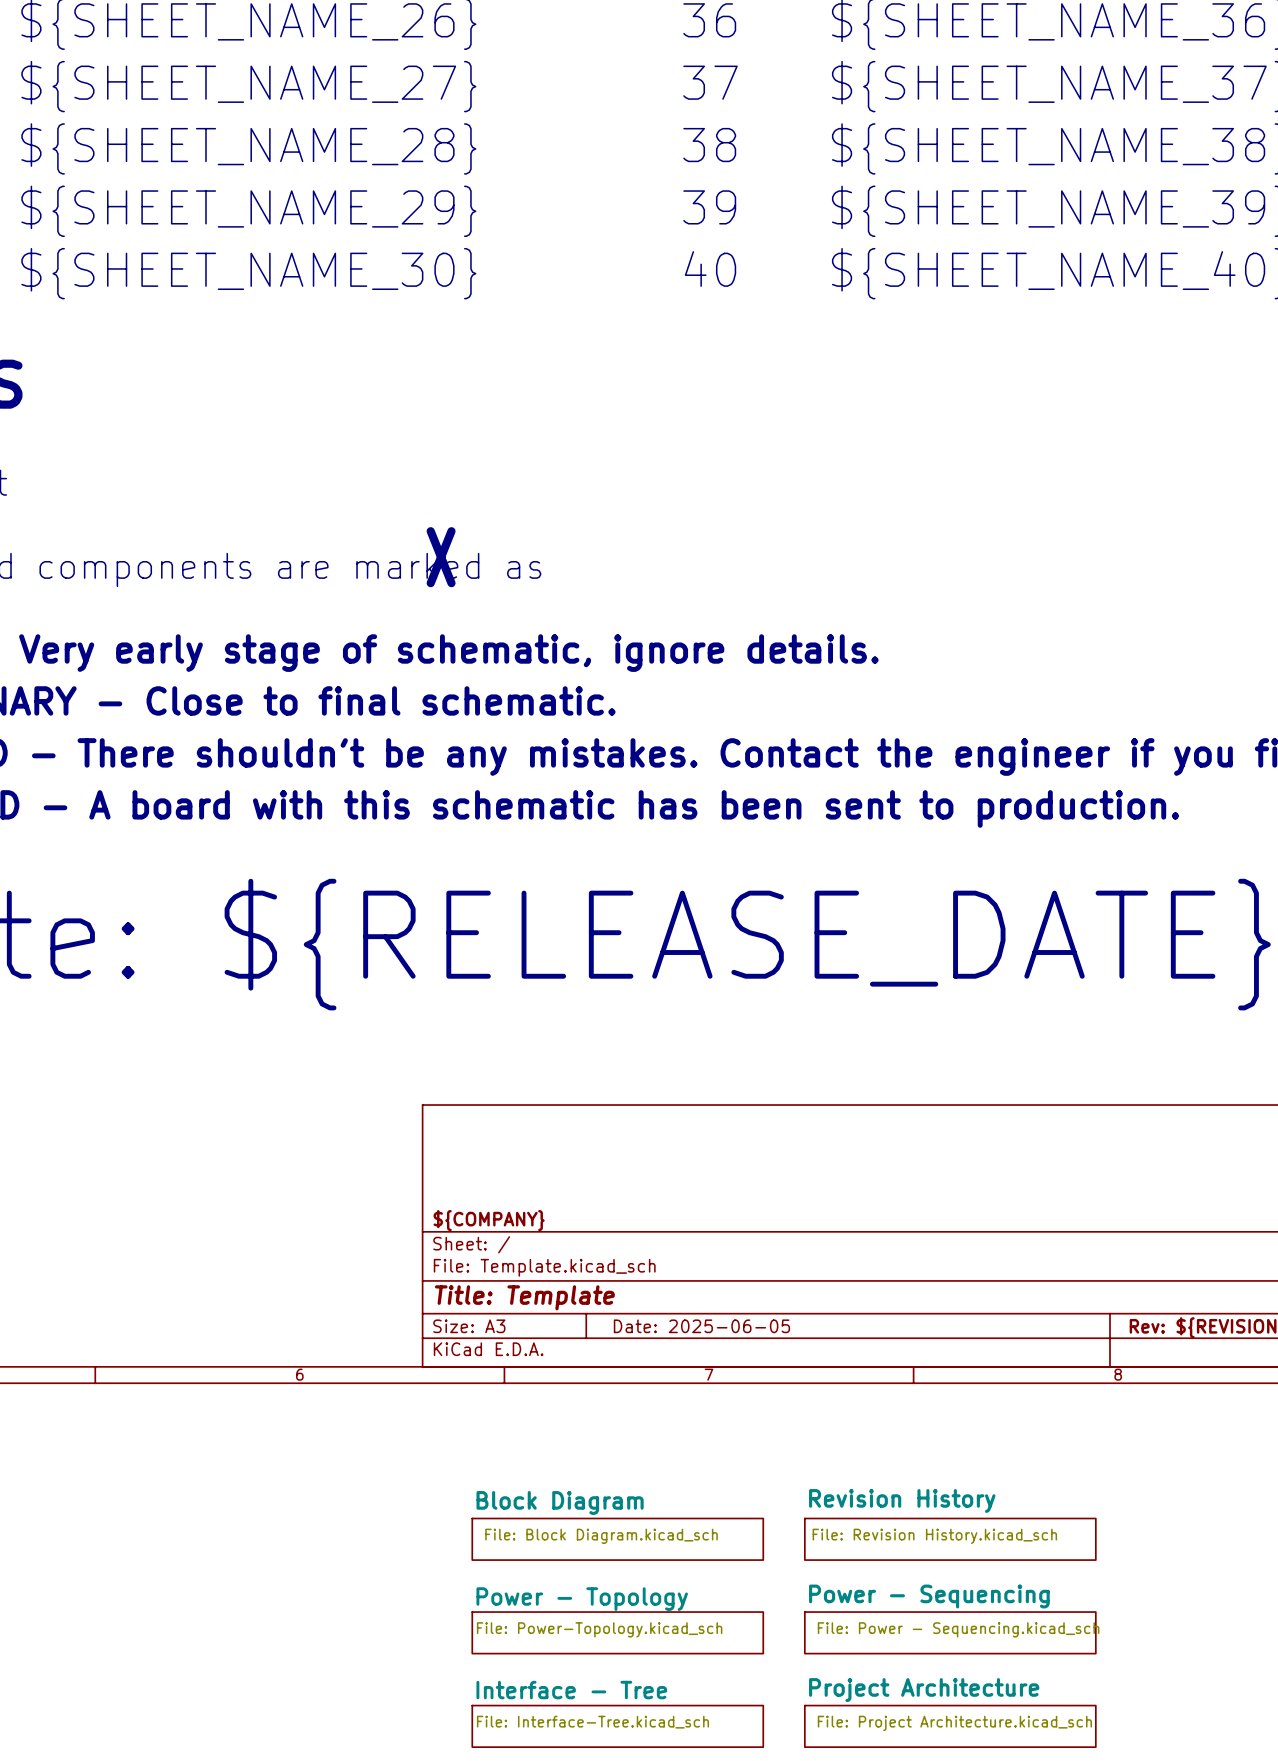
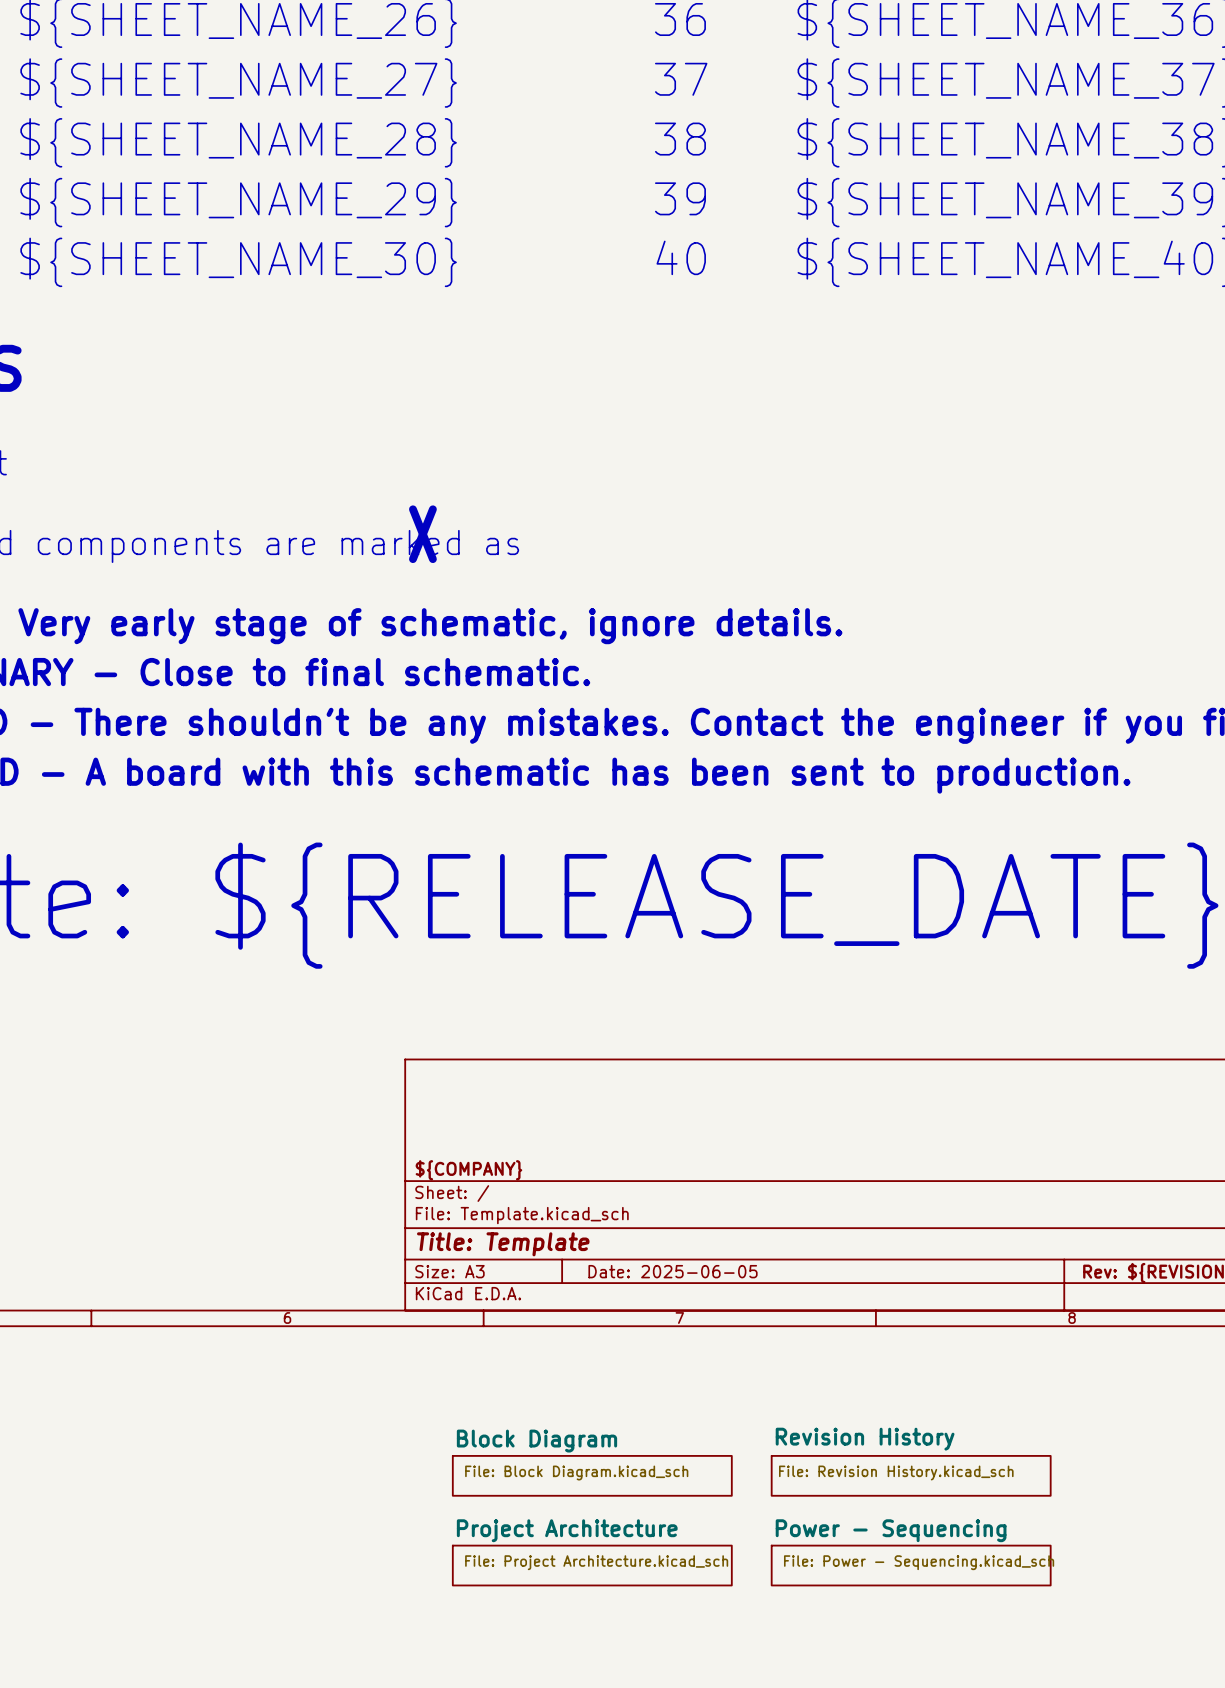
sheet Power - Topology name: Power - Topology (582, 1599) -> Project Architecture (567, 1530)
sheet Power - Topology value: File: Power-Topology.kicad_sch (599, 1629) -> File: Project Architecture.kicad_sch (596, 1562)
sheet Interface - Tree: File: Interface-Tree.kicad_sch (617, 1726) -> none
sheet Project Architecture: File: Project Architecture.kicad_sch (950, 1726) -> none

